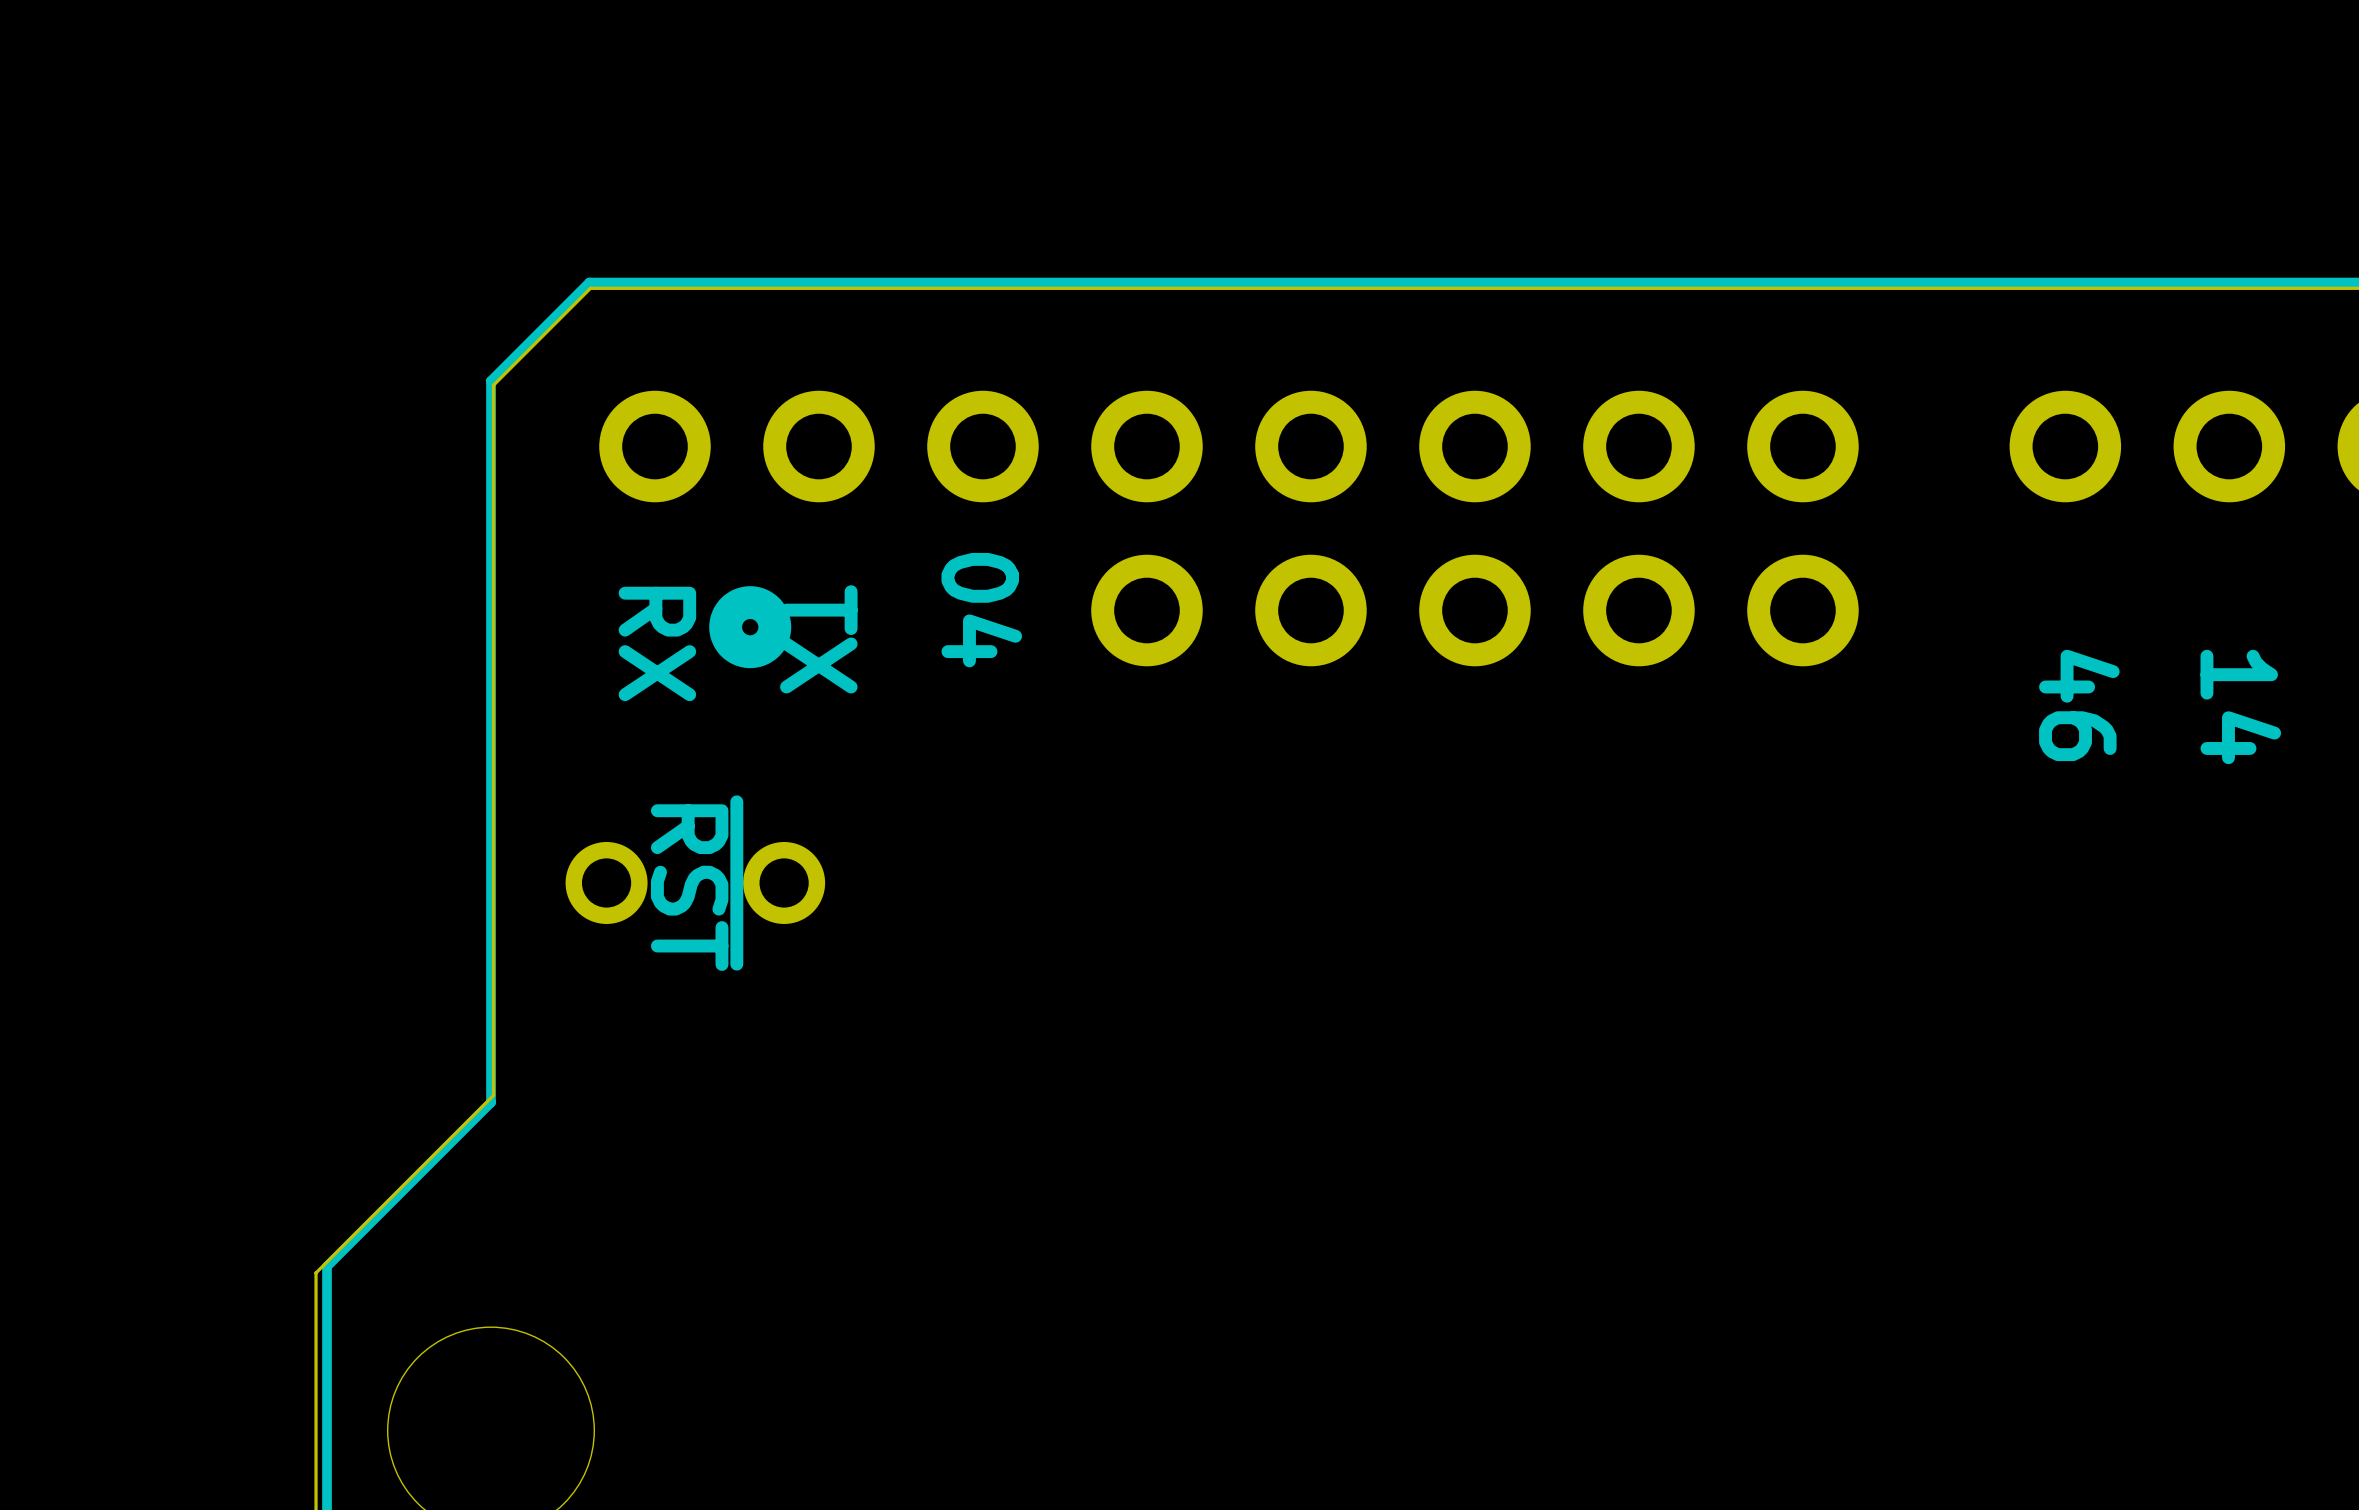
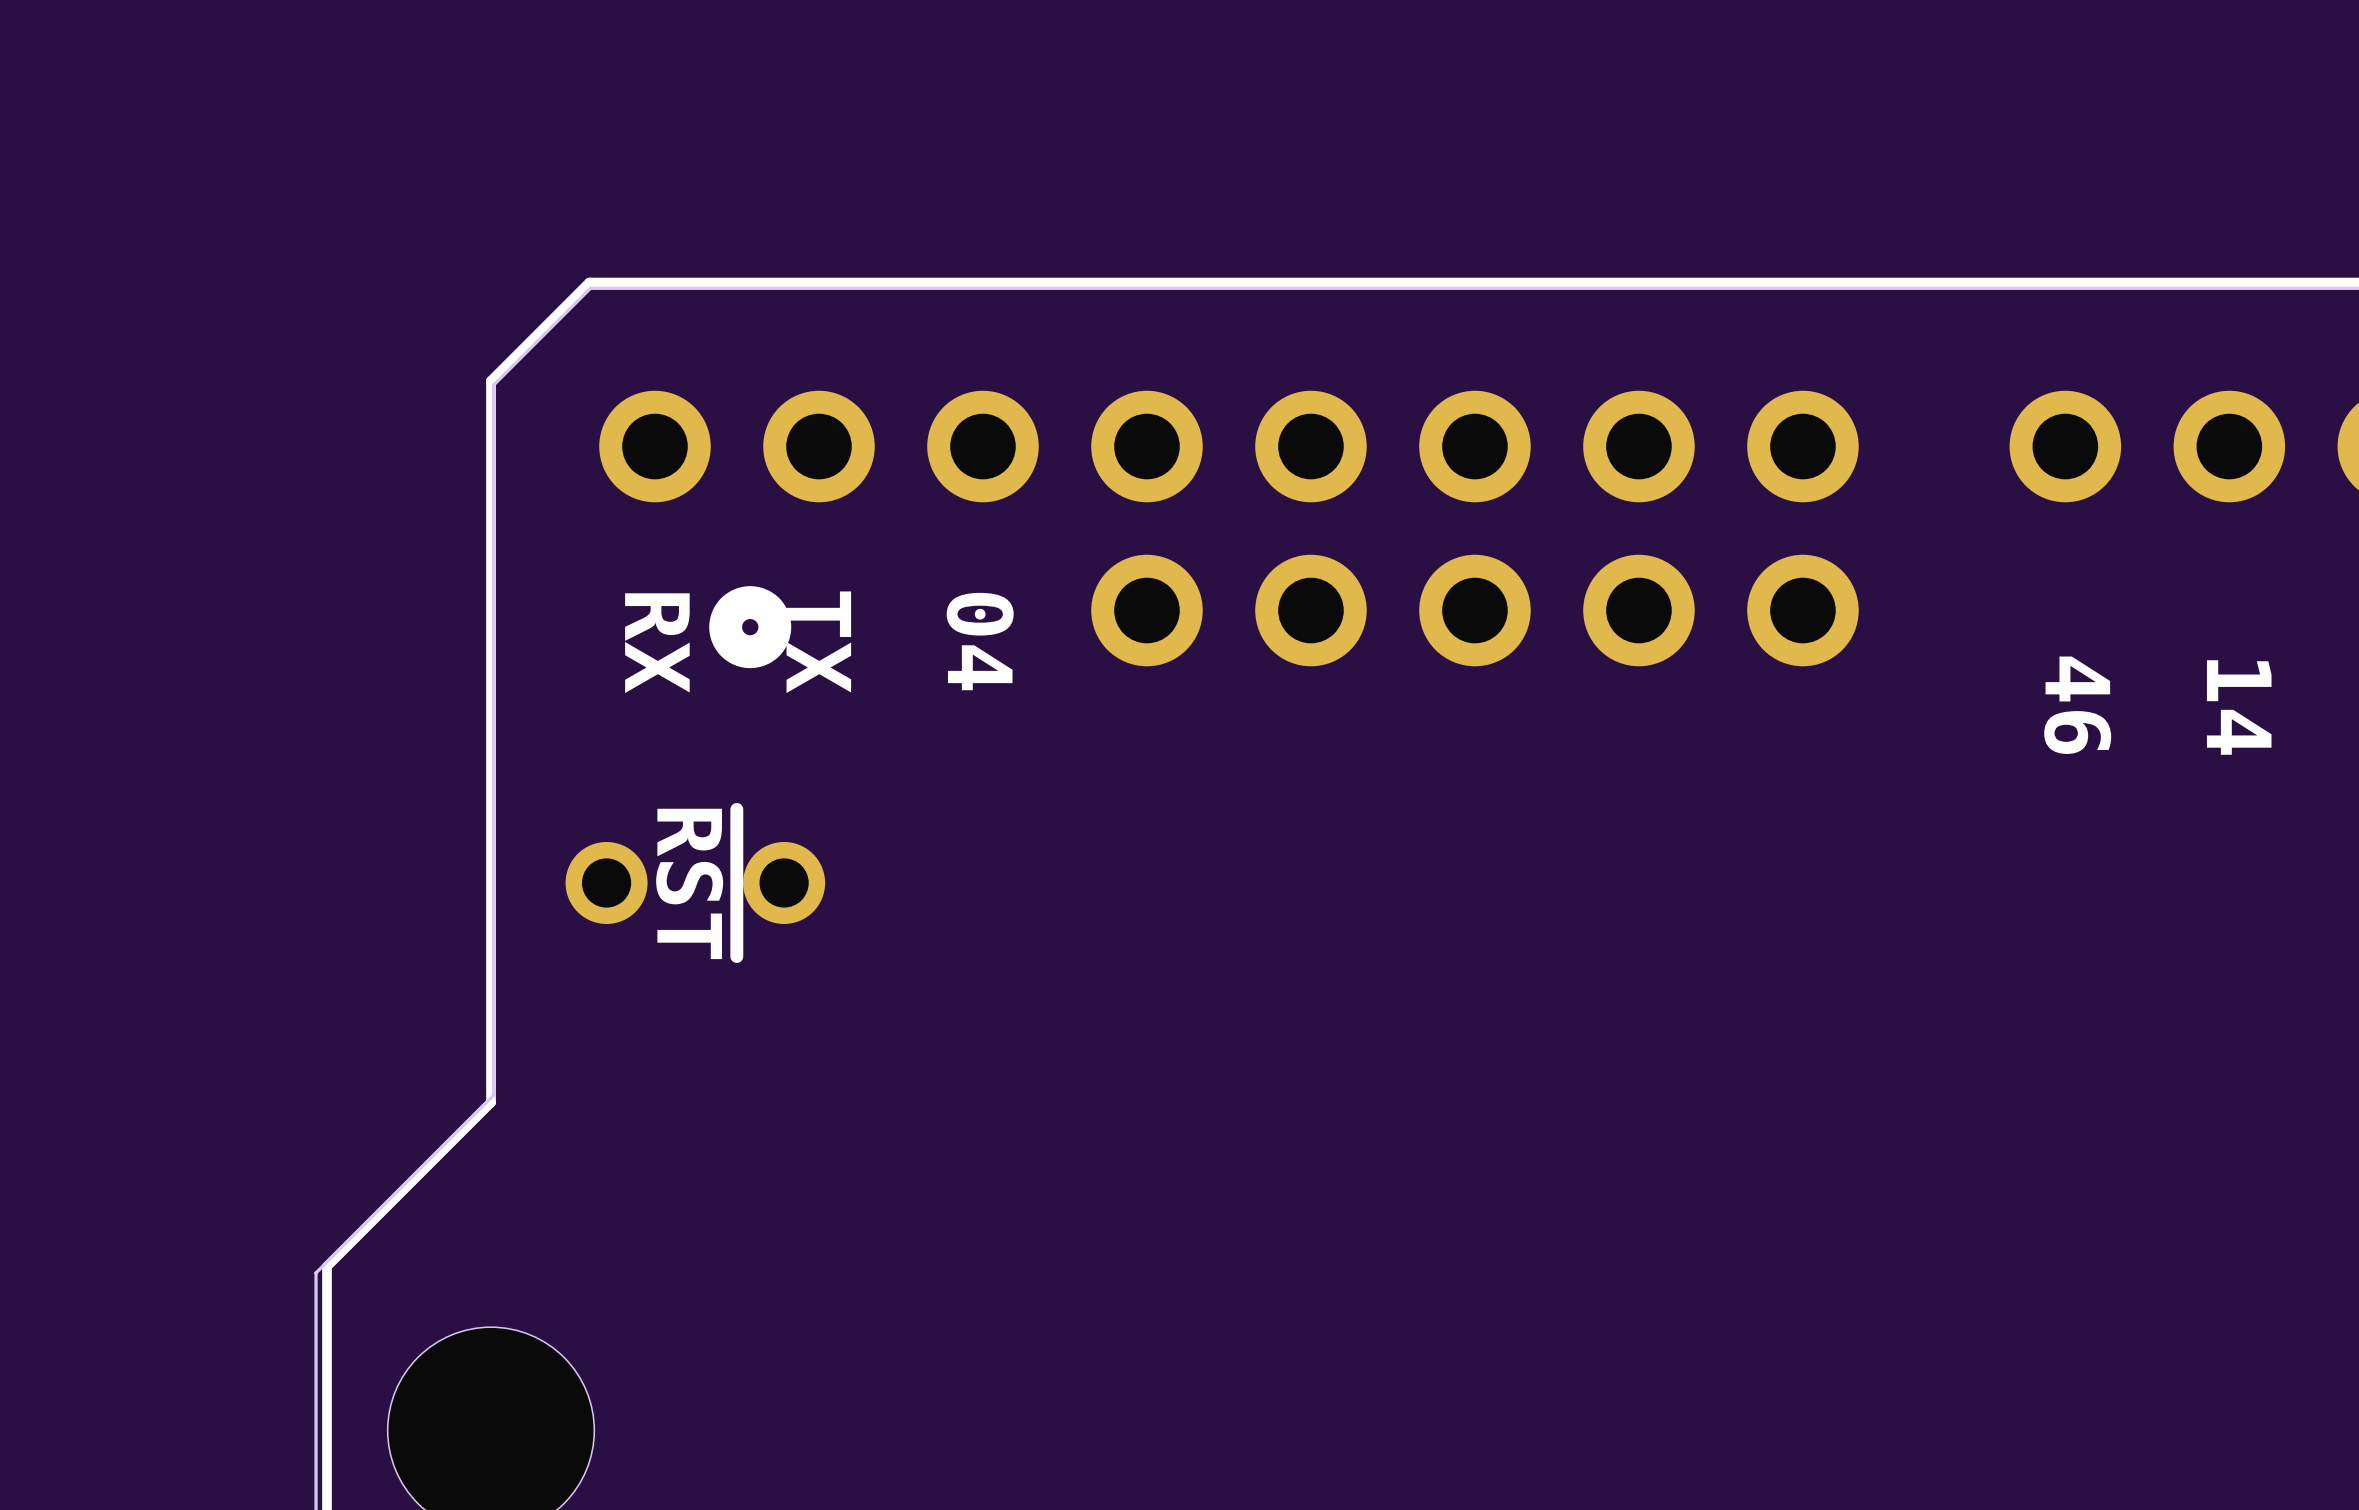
text position: 04 (981, 610) -> 04 (980, 641)

